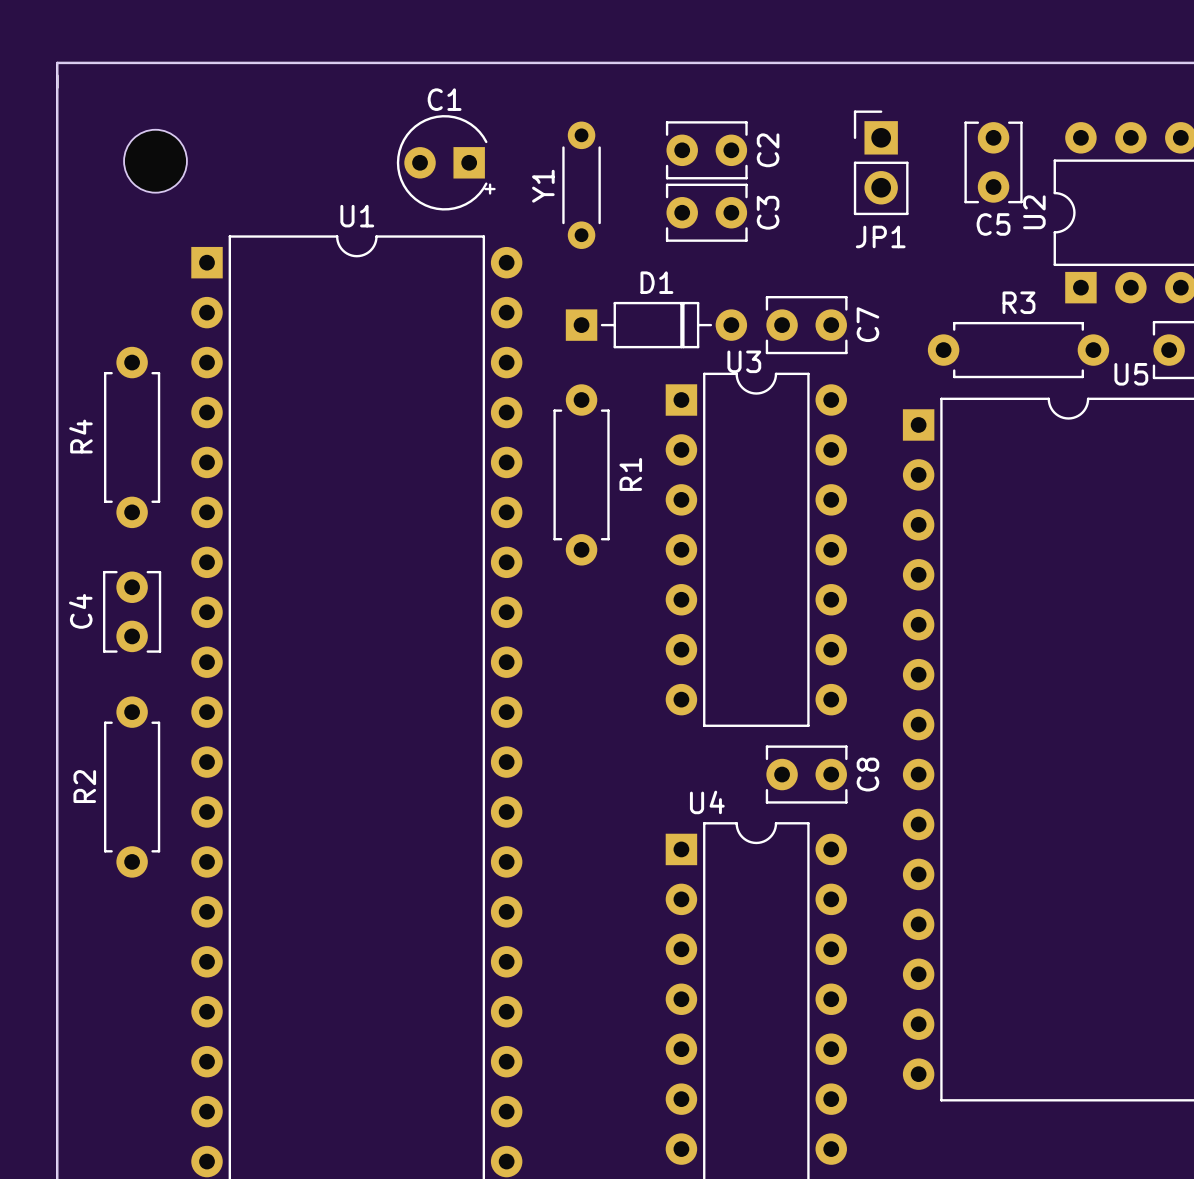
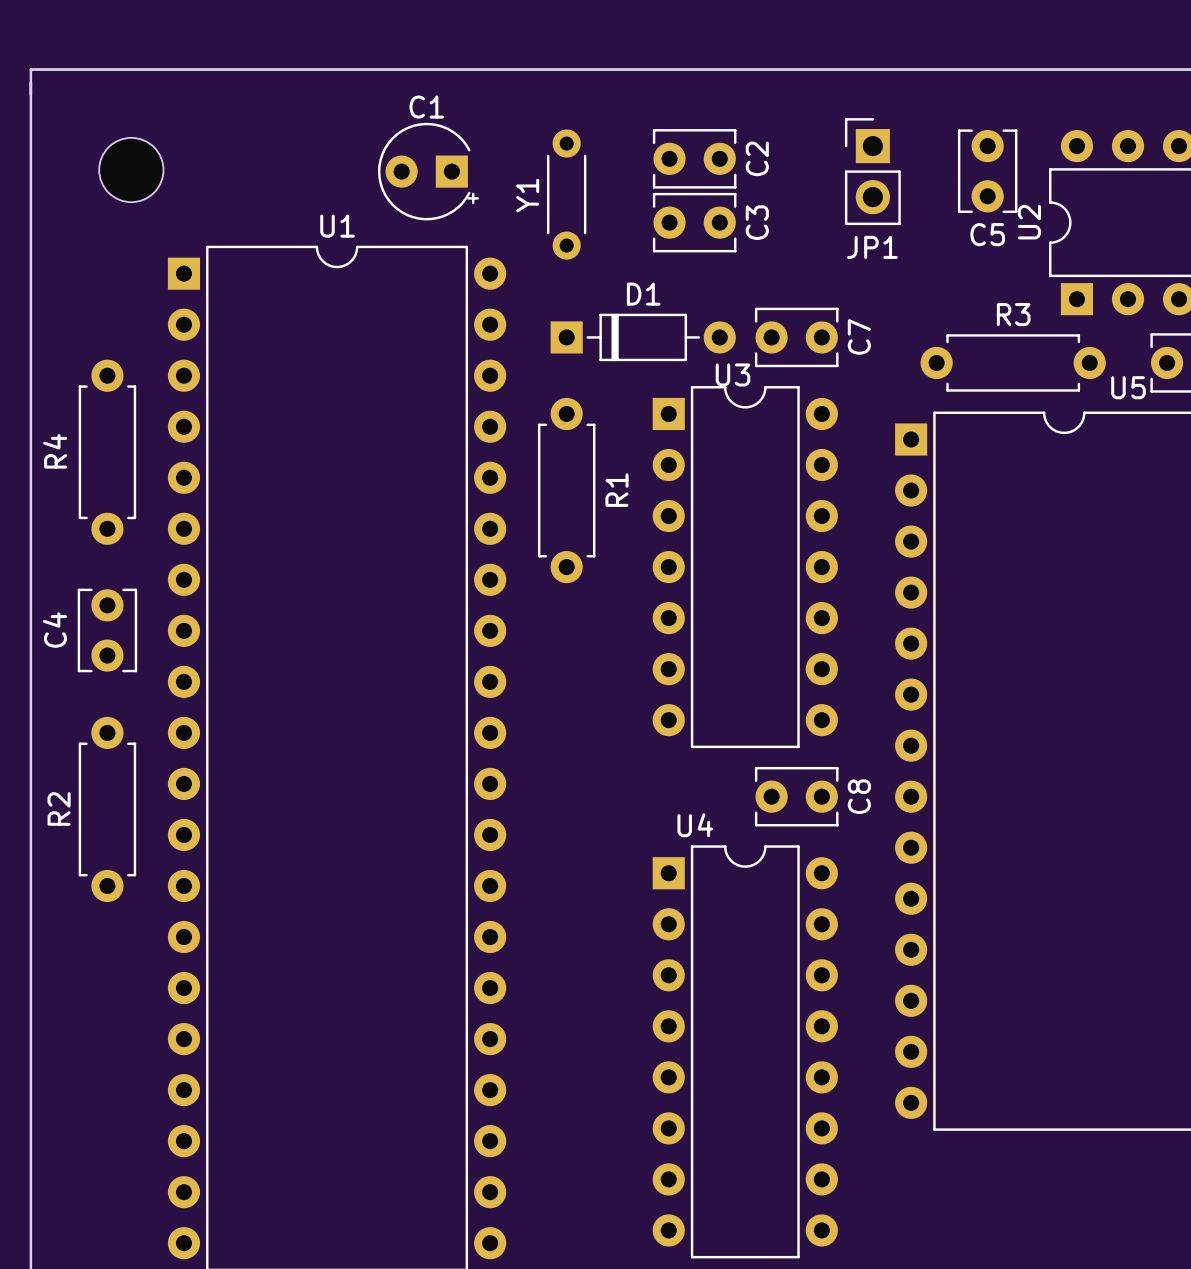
D1 footprint: [565, 301, 748, 349] -> [550, 313, 736, 362]

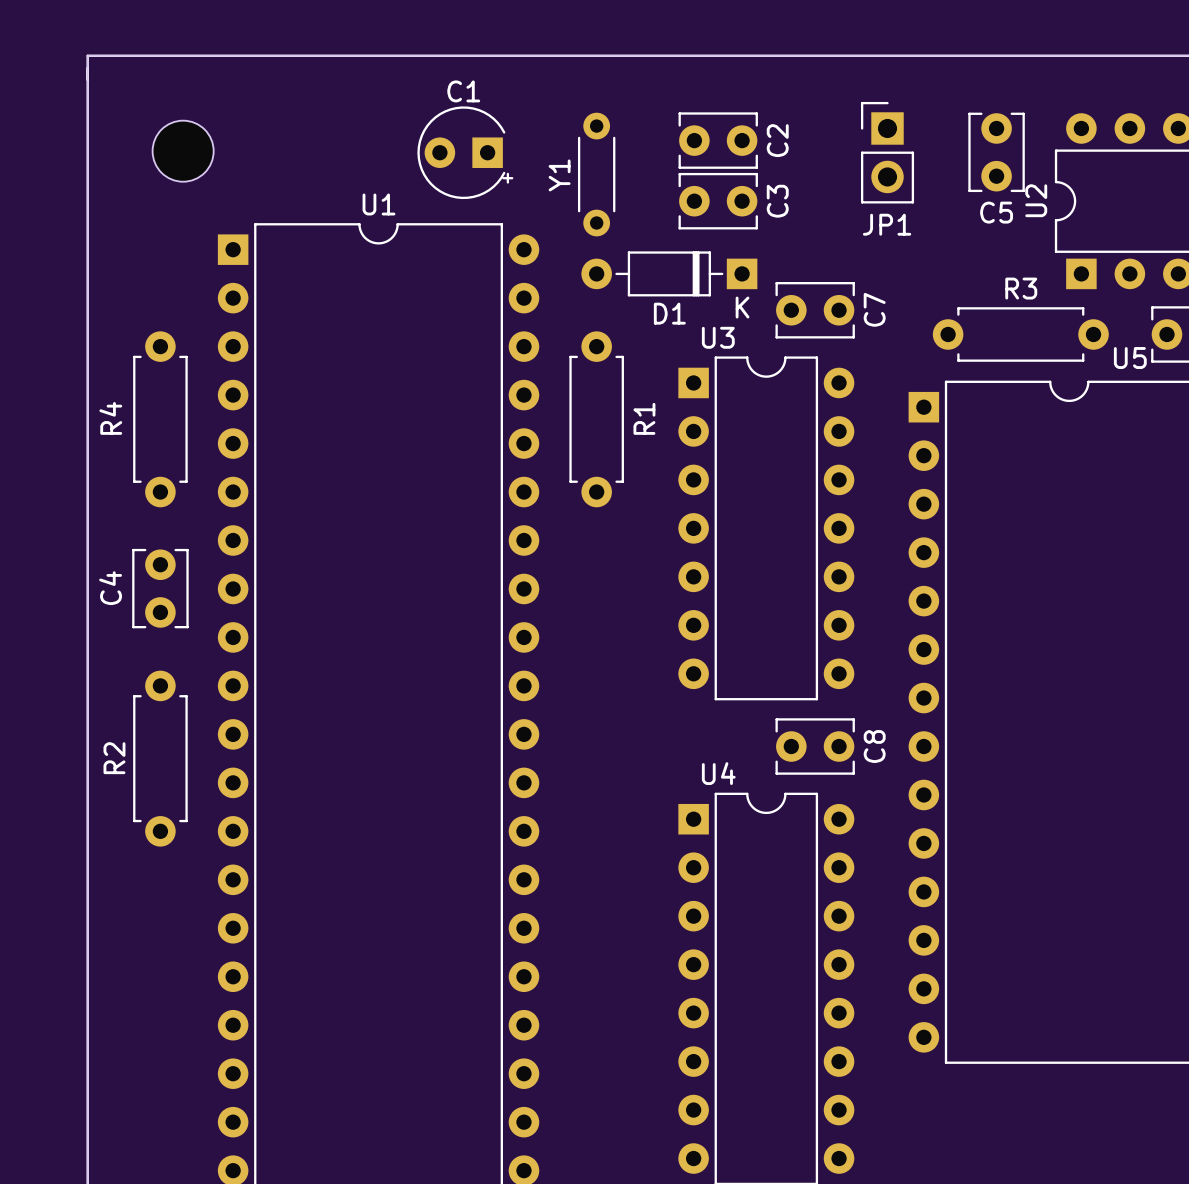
D1 name position: D1 (643, 294) -> D1 (669, 313)
D1 footprint: [550, 313, 736, 362] -> [581, 251, 758, 297]
U3 name position: U3 (733, 374) -> U3 (718, 337)
R1 position: (566, 490) -> (596, 419)

